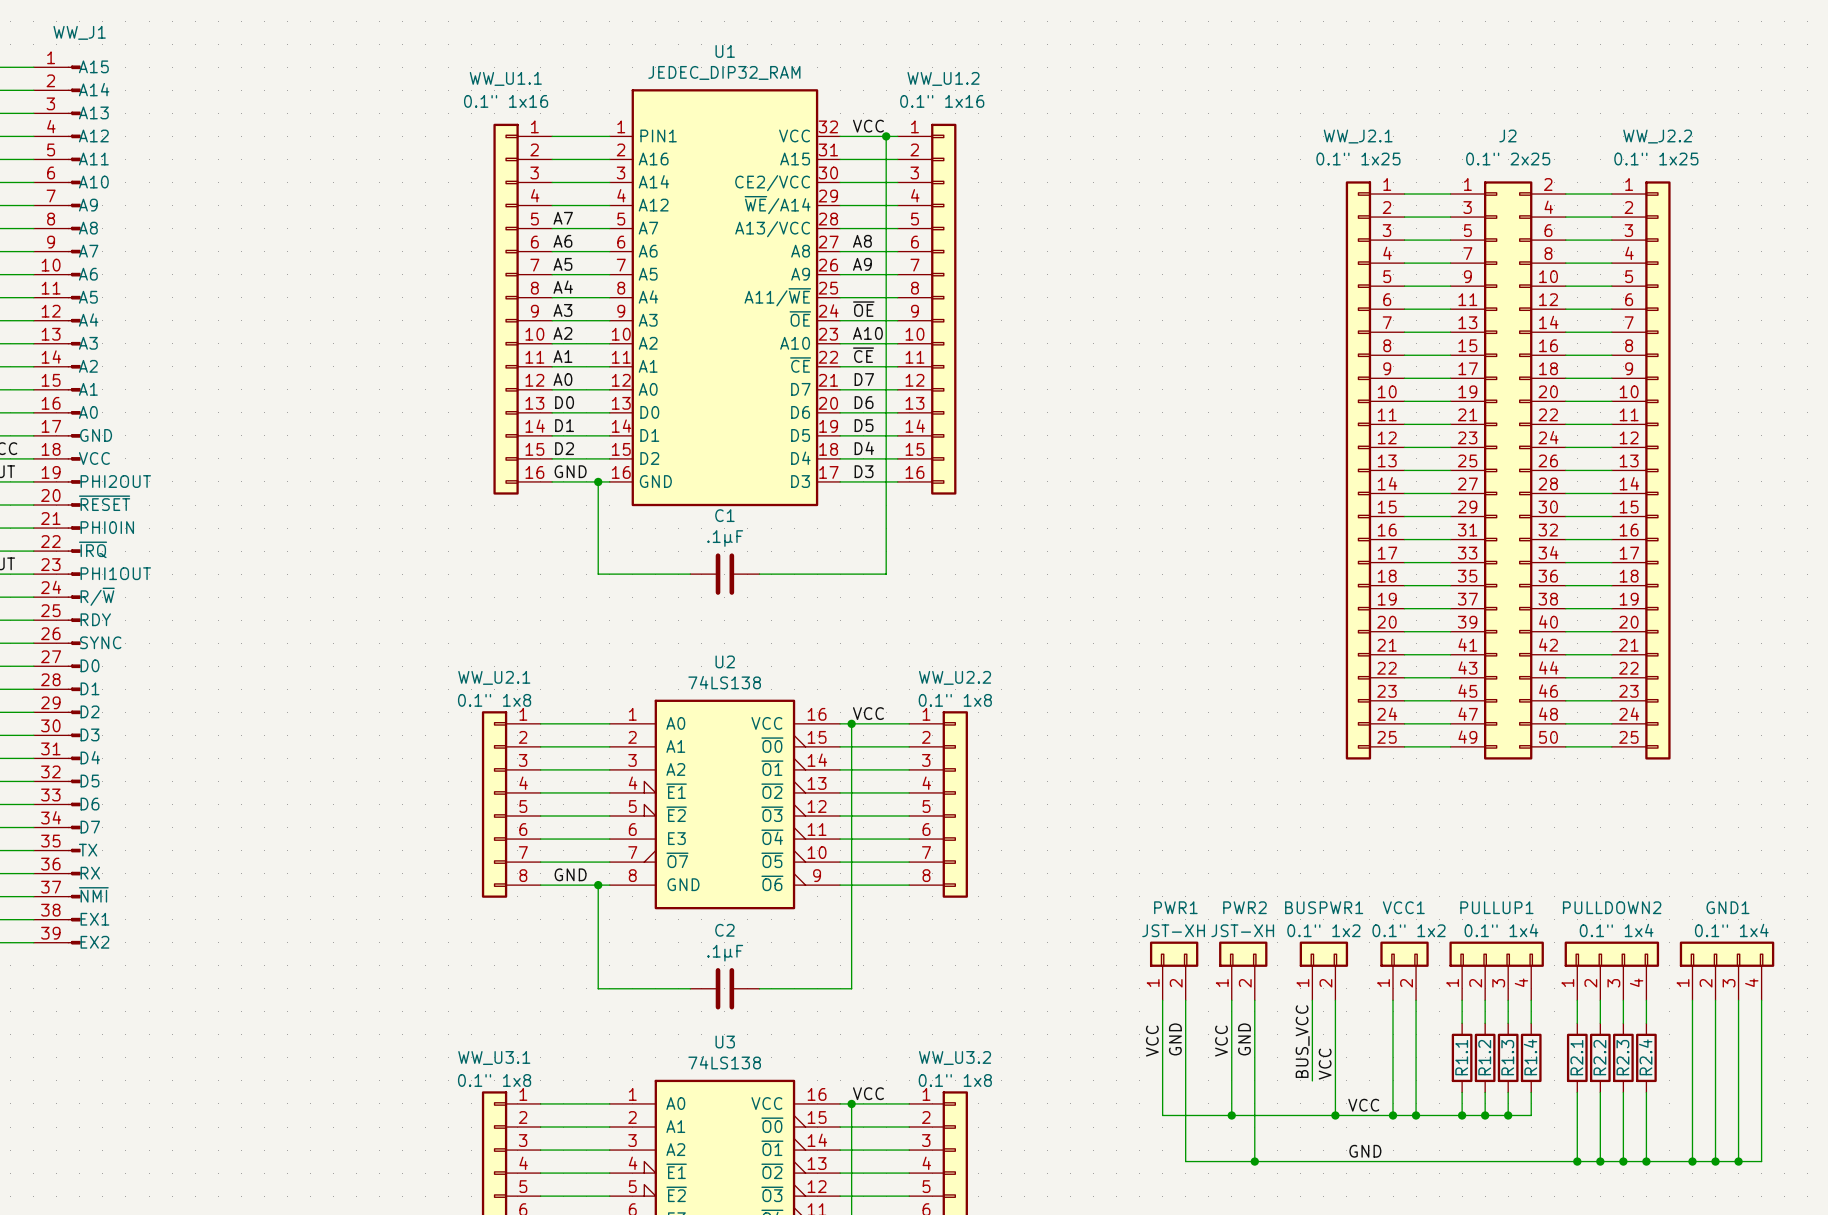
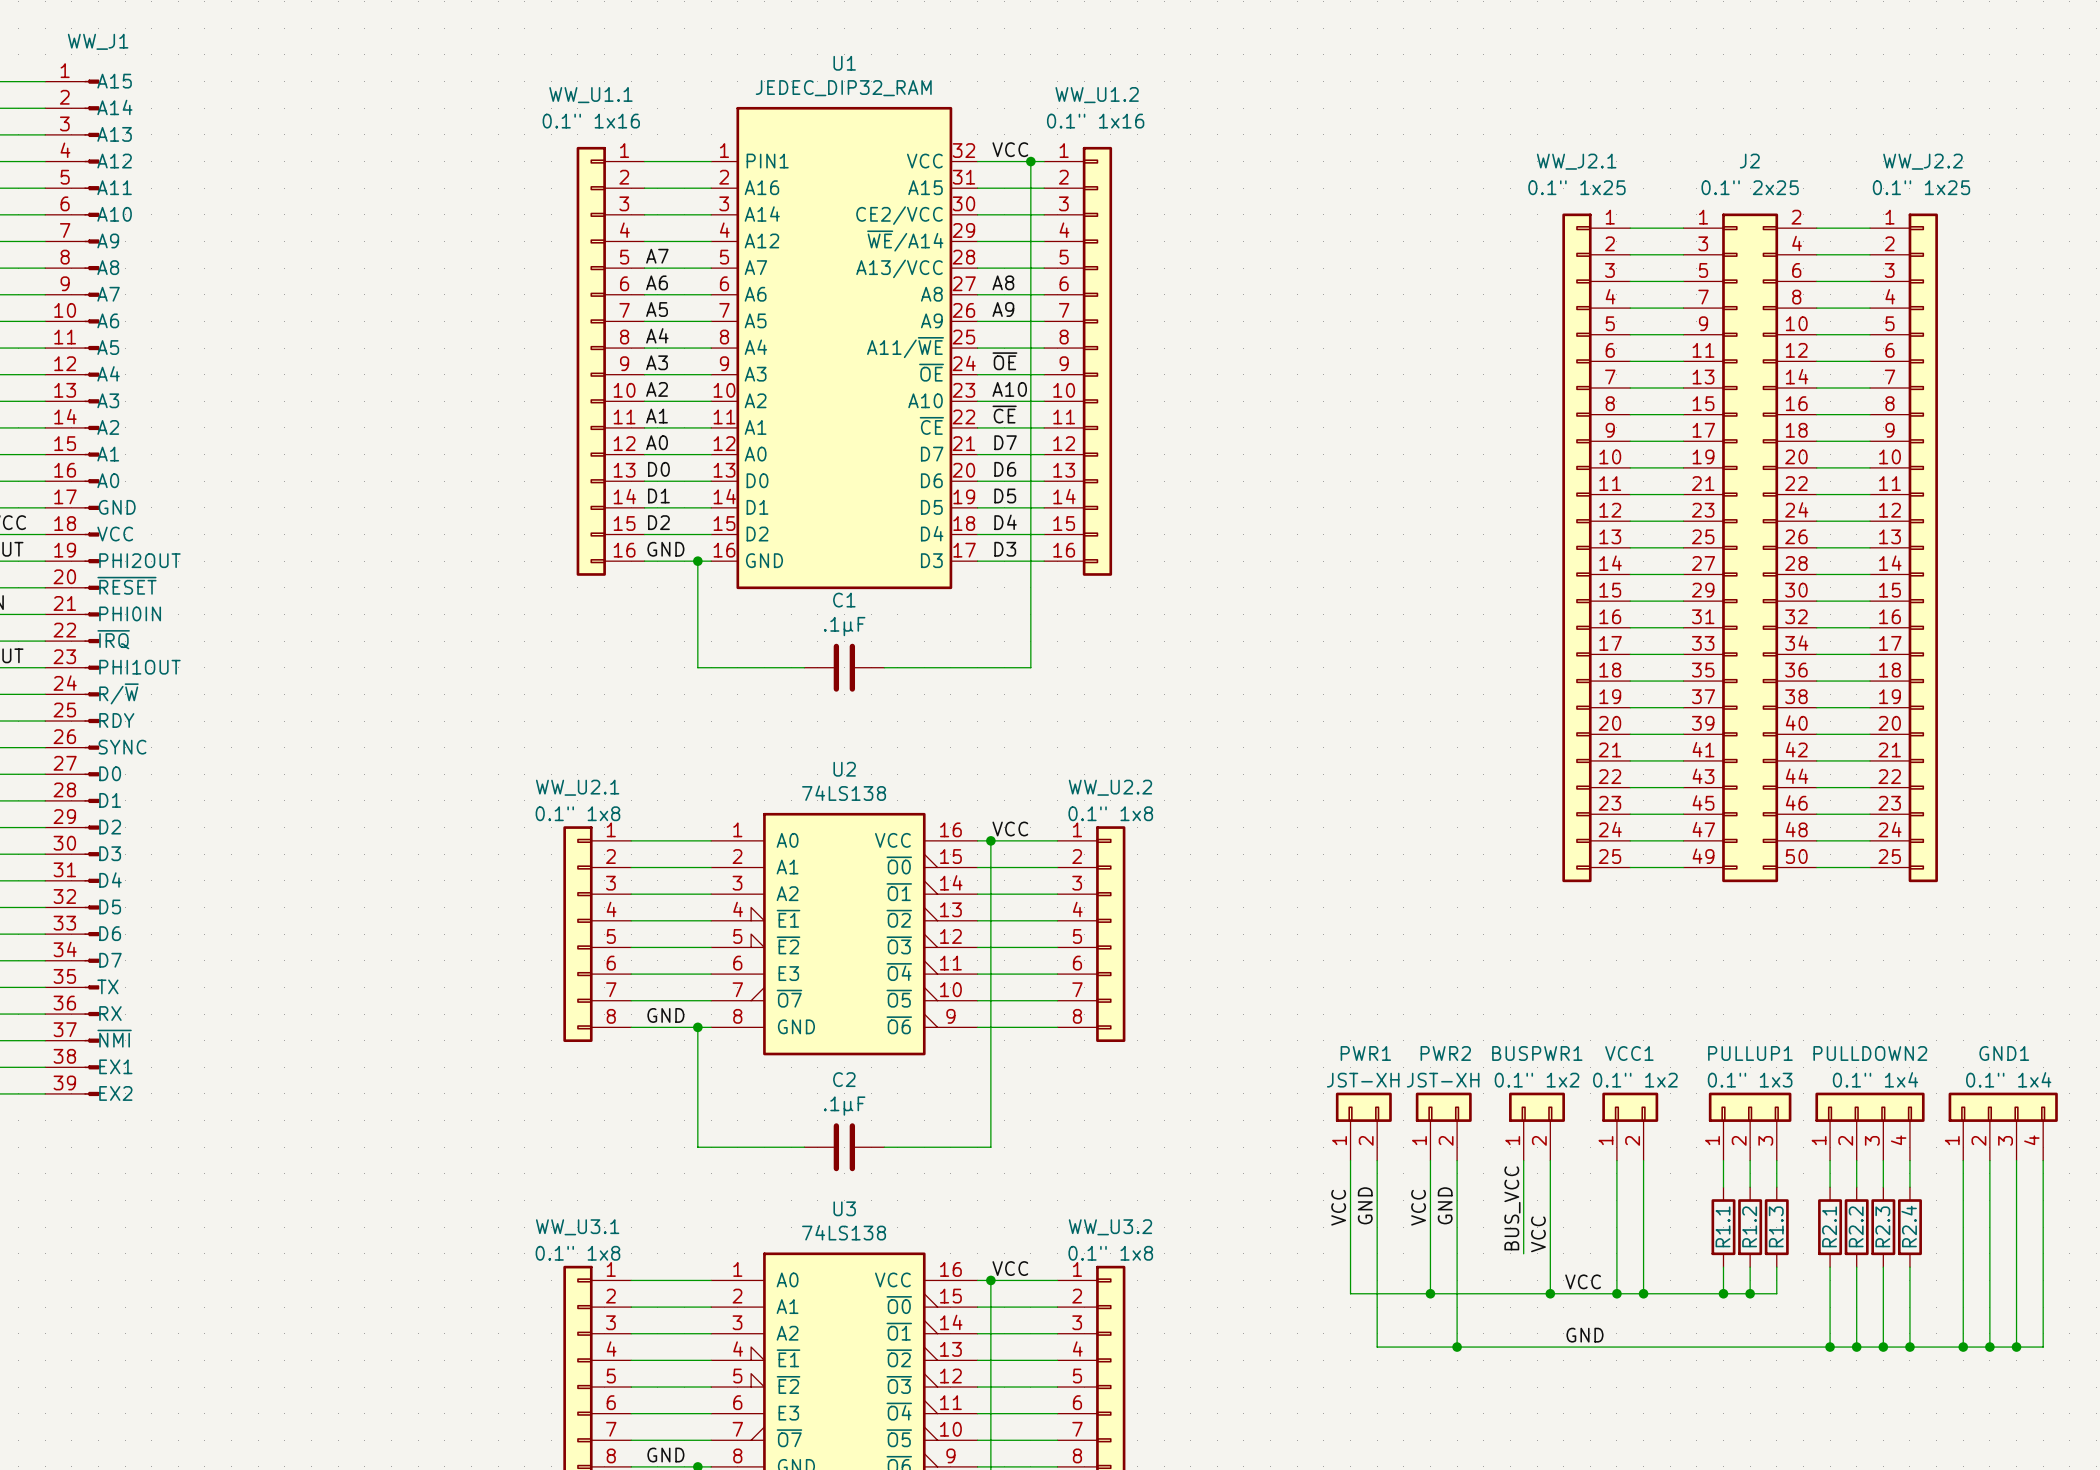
PULLUP1 value: 0.1" 1x4 (1501, 930) -> 0.1" 1x3 (1750, 1080)
PULLUP1 symbol: [1449, 941, 1544, 1001] -> [1708, 1092, 1792, 1161]
wire: (1462, 1000) (1462, 1023) -> none
R1.1: (1462, 1057) -> none
R1.2 name: R1.2 (1484, 1057) -> R1.1 (1722, 1226)
R1.3 name: R1.3 (1507, 1057) -> R1.2 (1749, 1226)
R1.4 name: R1.4 (1530, 1057) -> R1.3 (1776, 1226)
wire: (1462, 1092) (1462, 1115) -> none
junction: (1462, 1115) -> none

